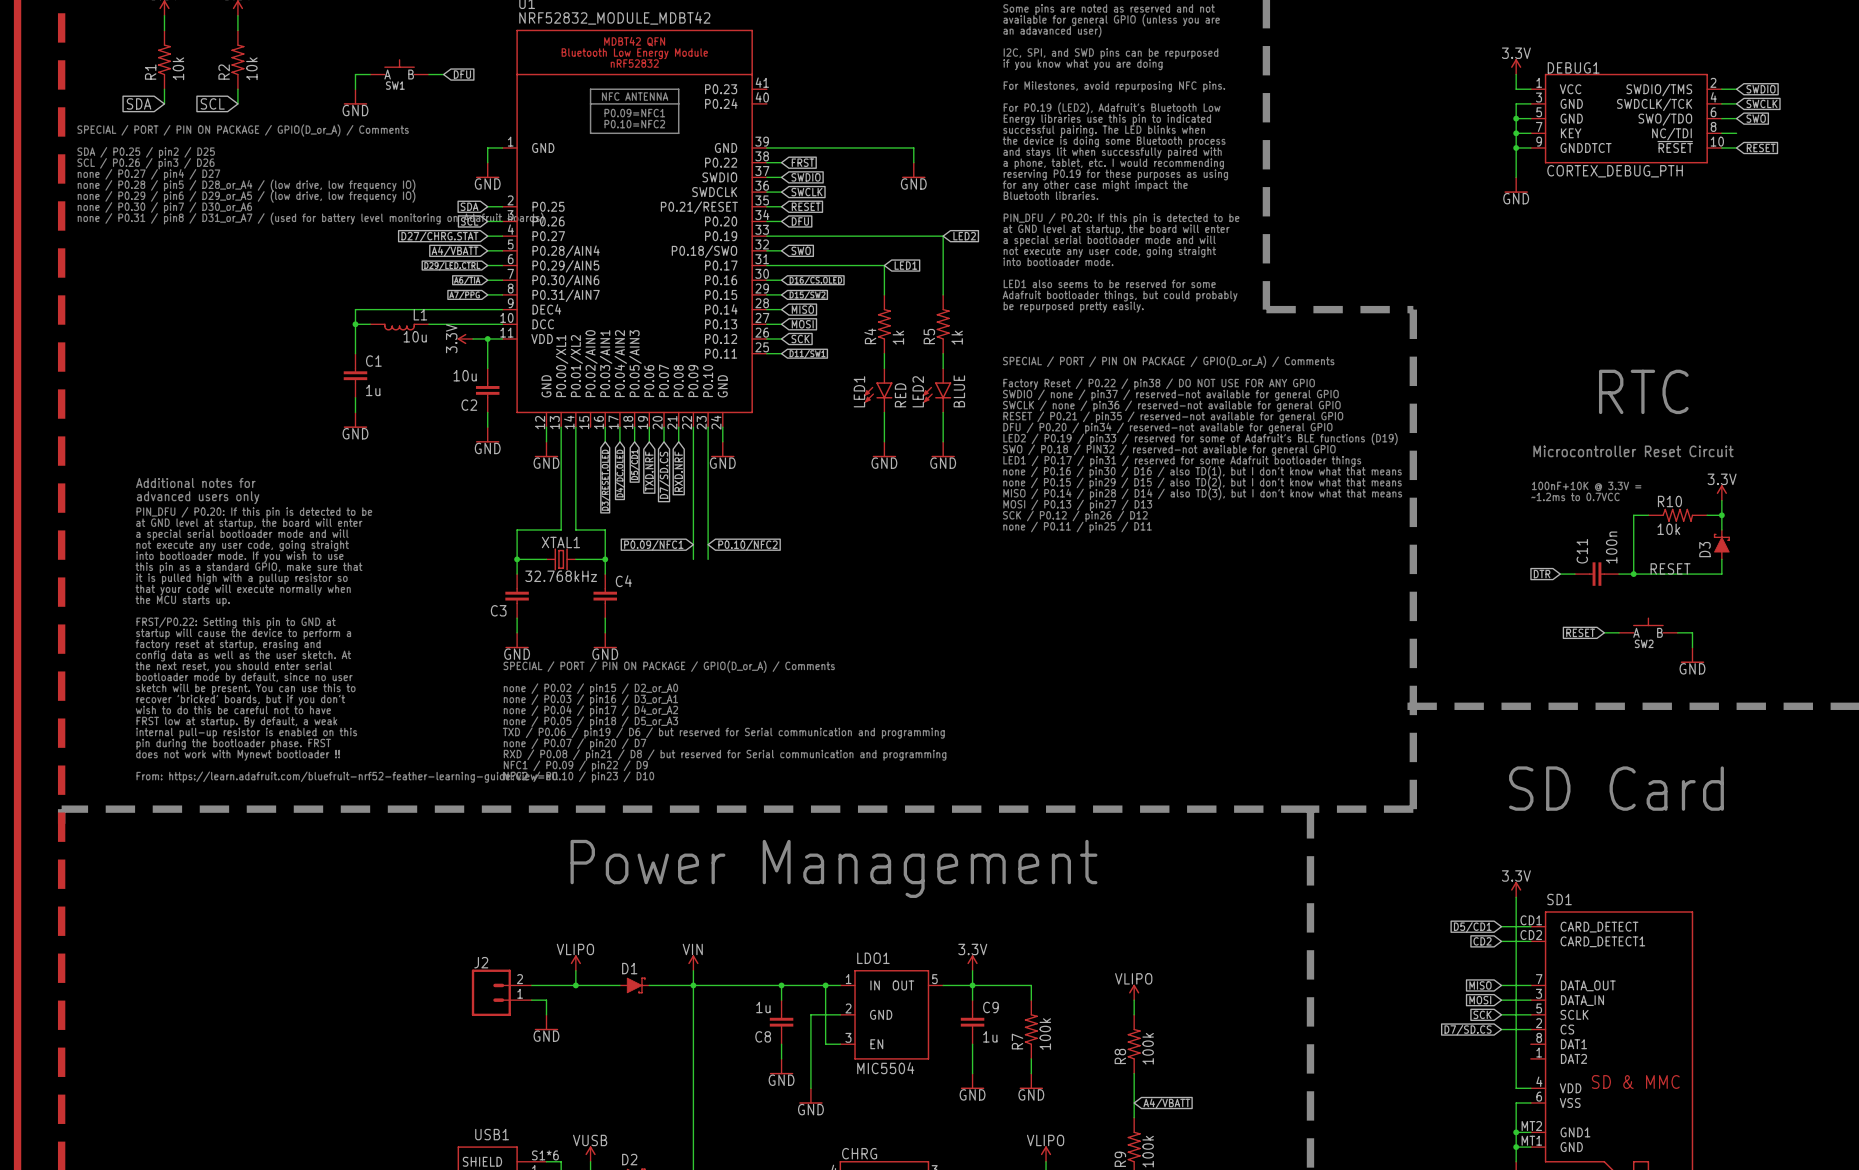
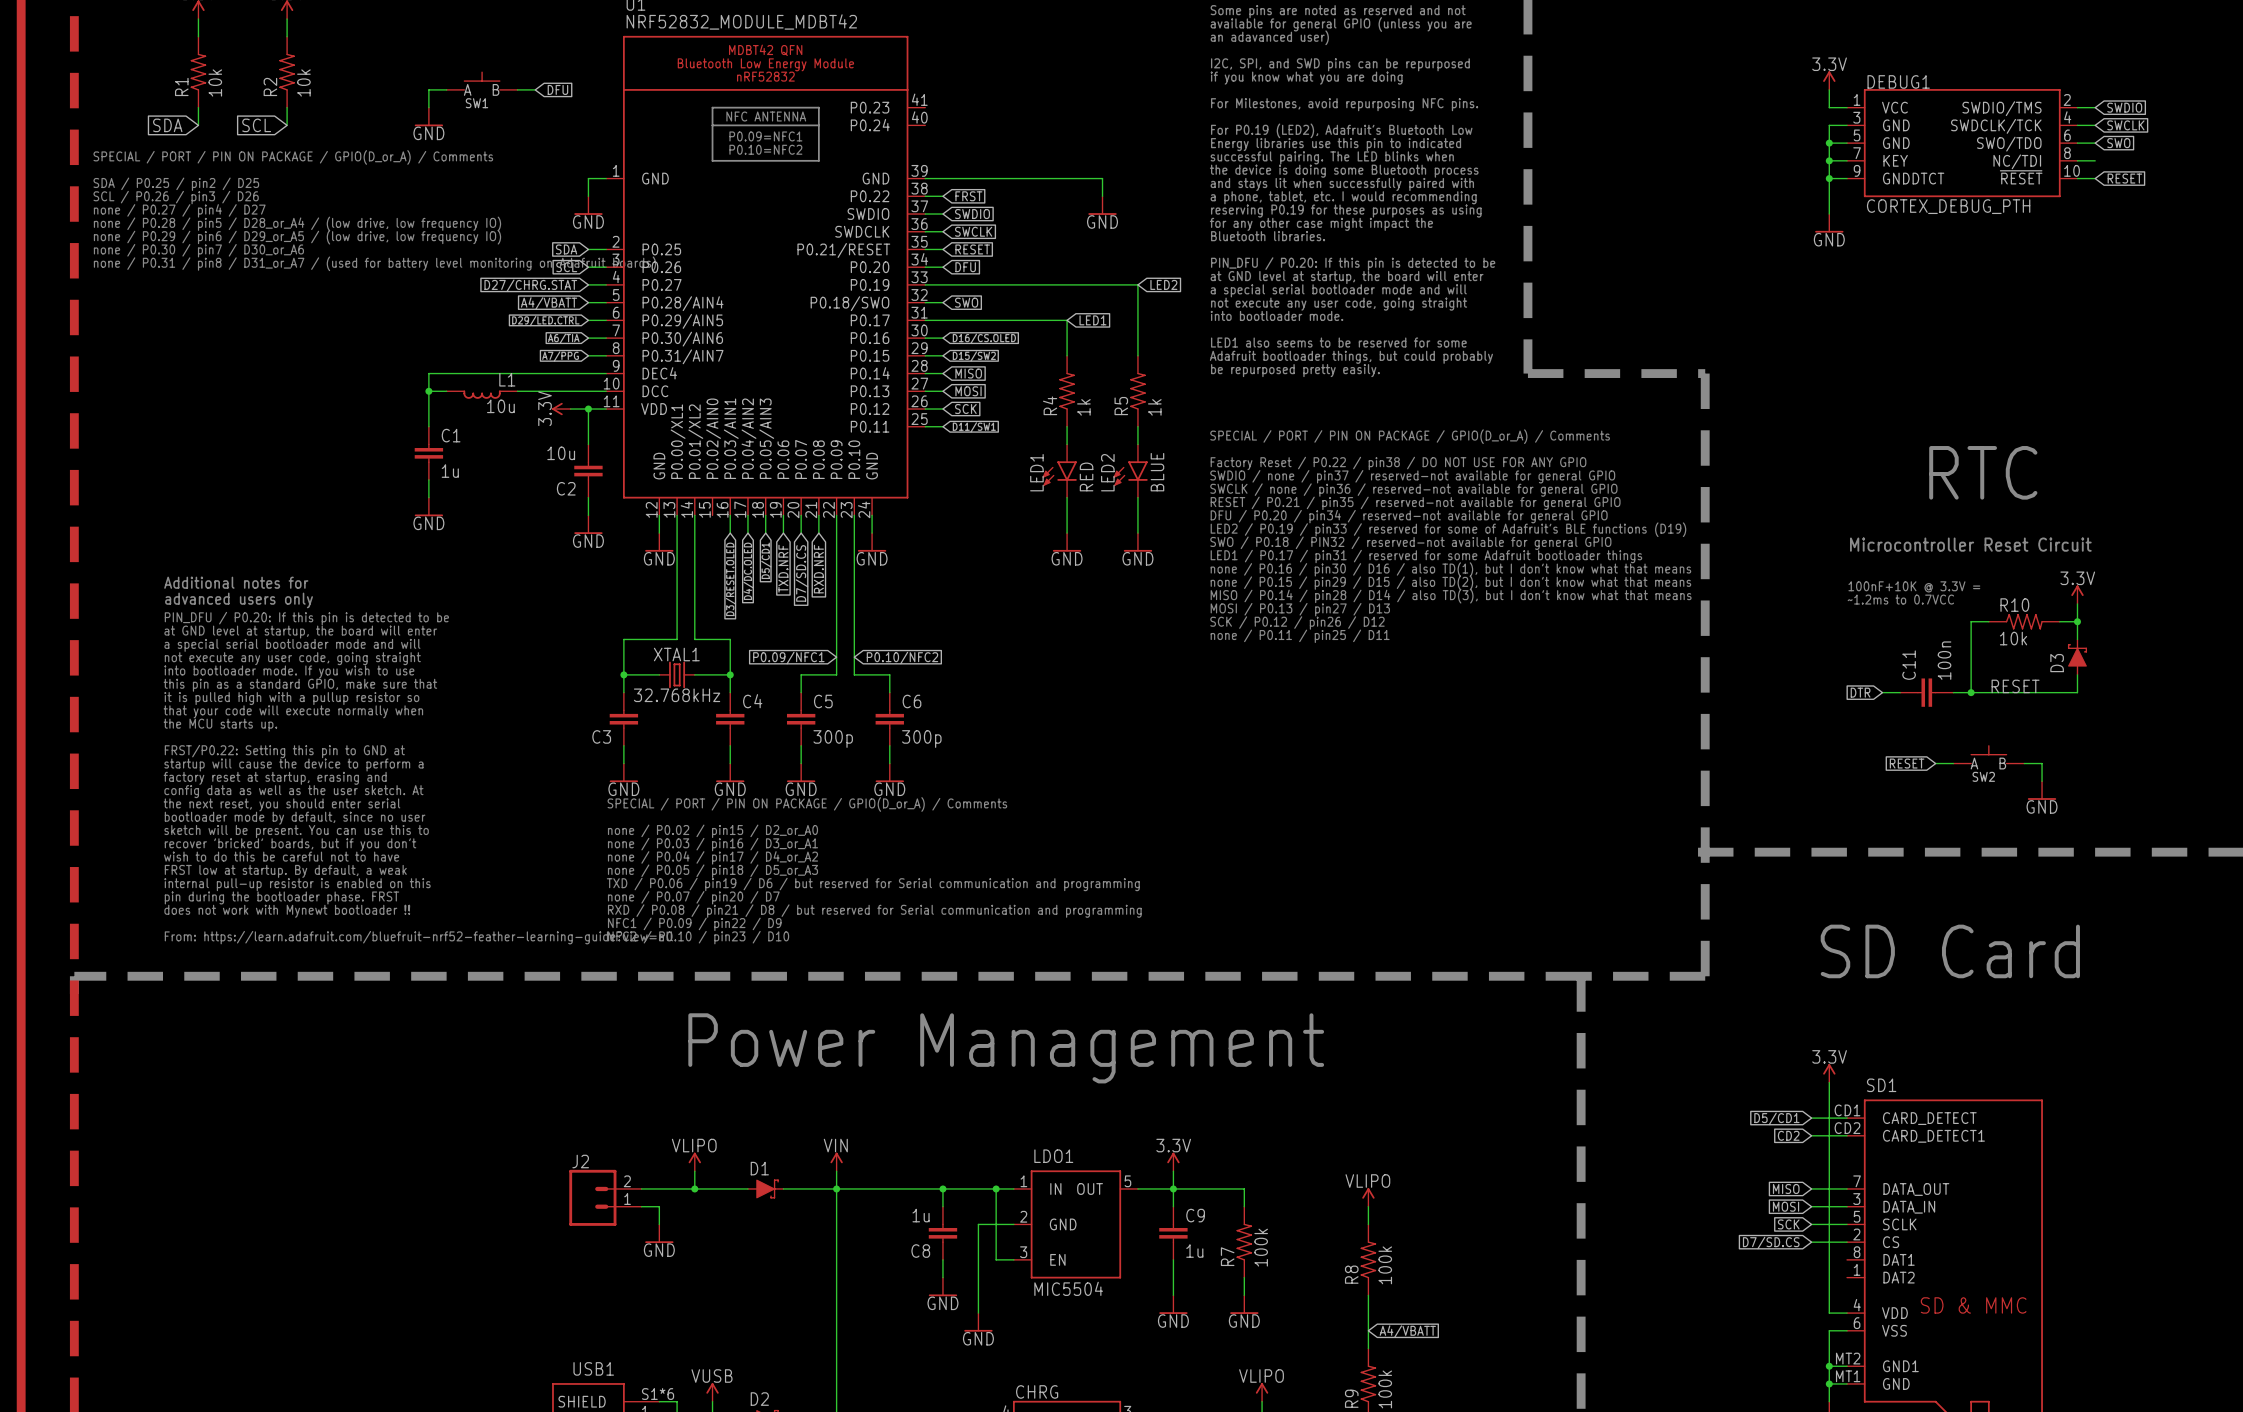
wire: none -> (836, 674) (801, 674) (801, 692)
wire: none -> (854, 674) (889, 674) (889, 692)
C5: none -> 300p (801, 719)
C6: none -> 300p (889, 719)
wire: none -> (801, 745) (801, 763)
wire: none -> (889, 745) (889, 763)
power symbol: none -> GND (801, 772)
power symbol: none -> GND (889, 772)

